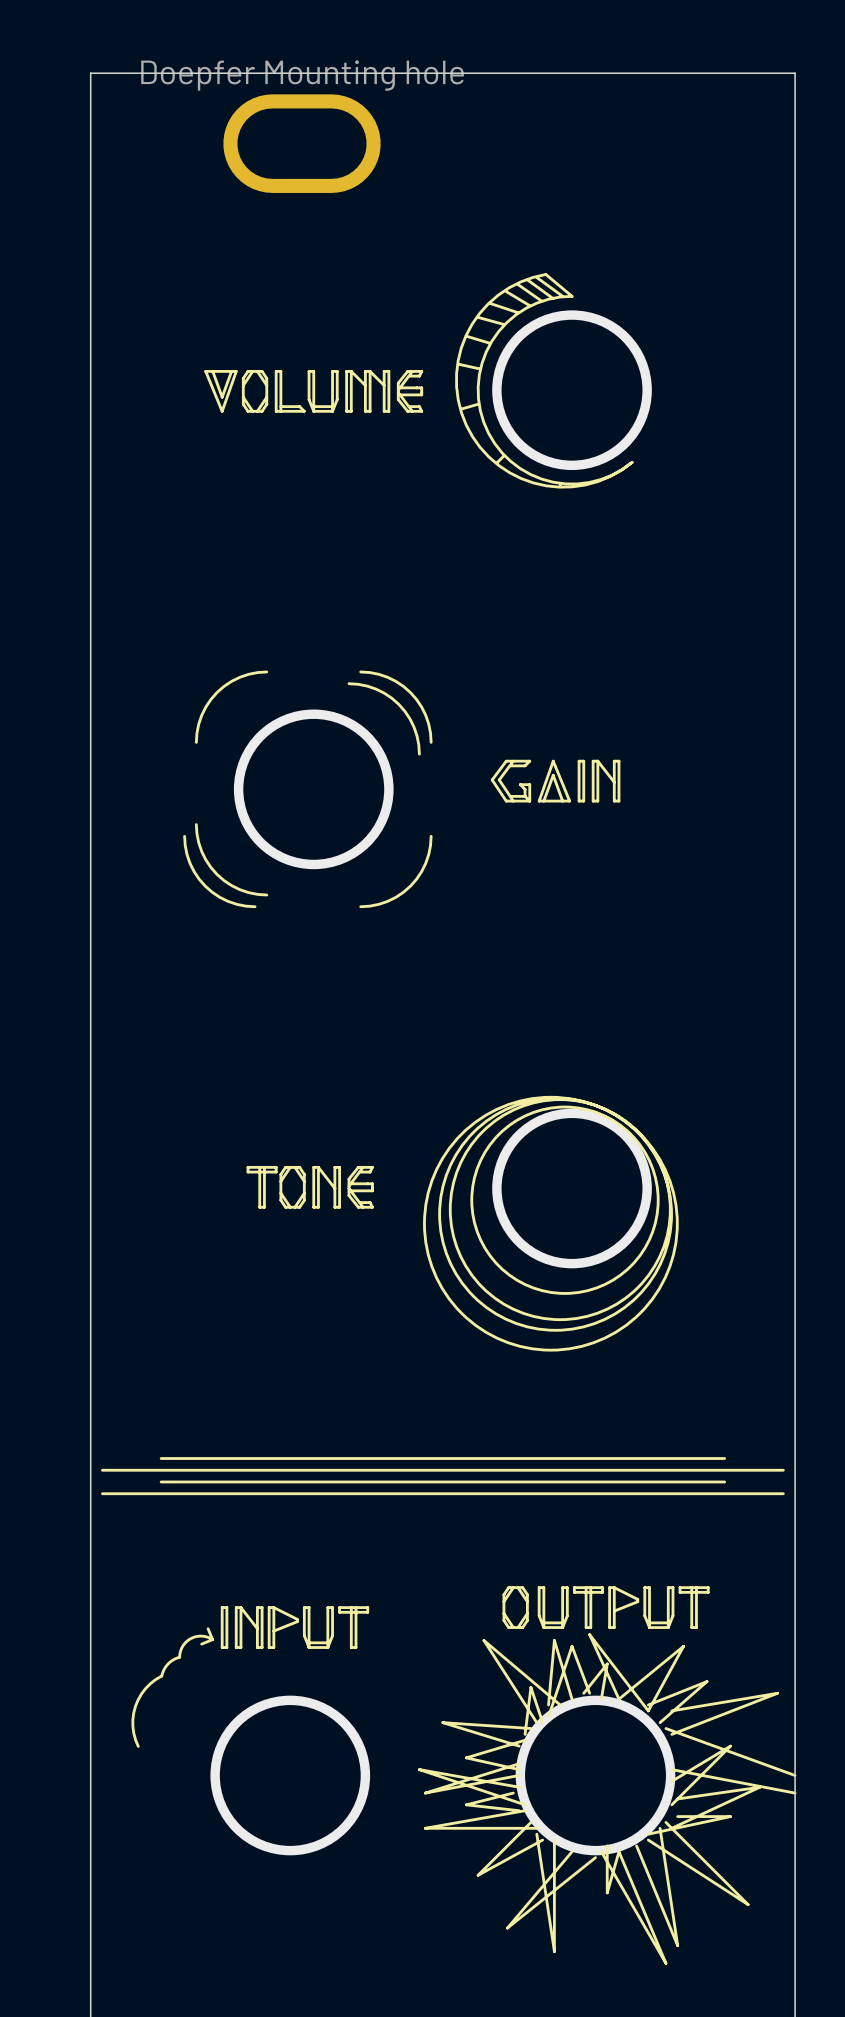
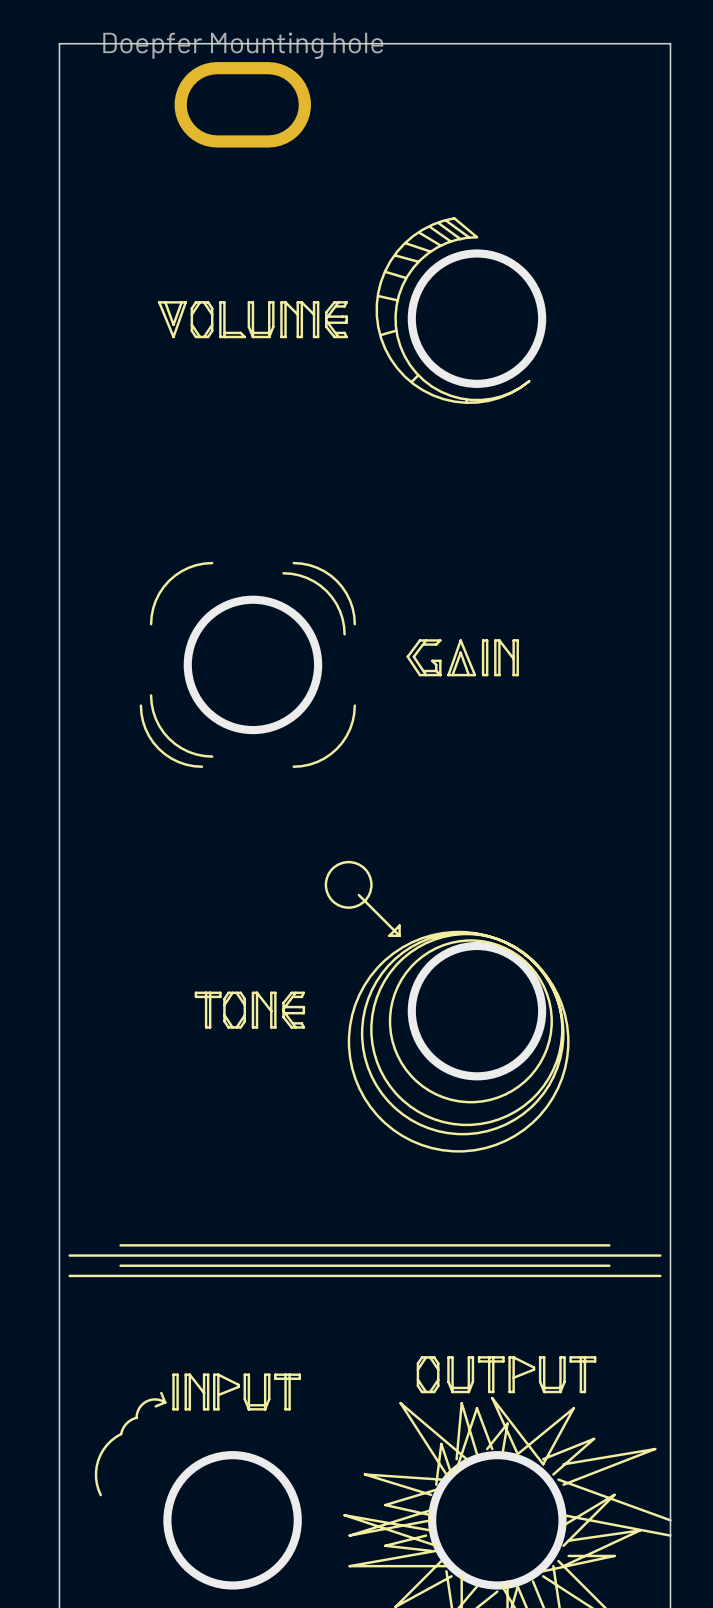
drawing: none -> [324, 860, 373, 909]
line: none -> (358, 895) (399, 935)
line: none -> (399, 935) (399, 925) (389, 935) (399, 935)

